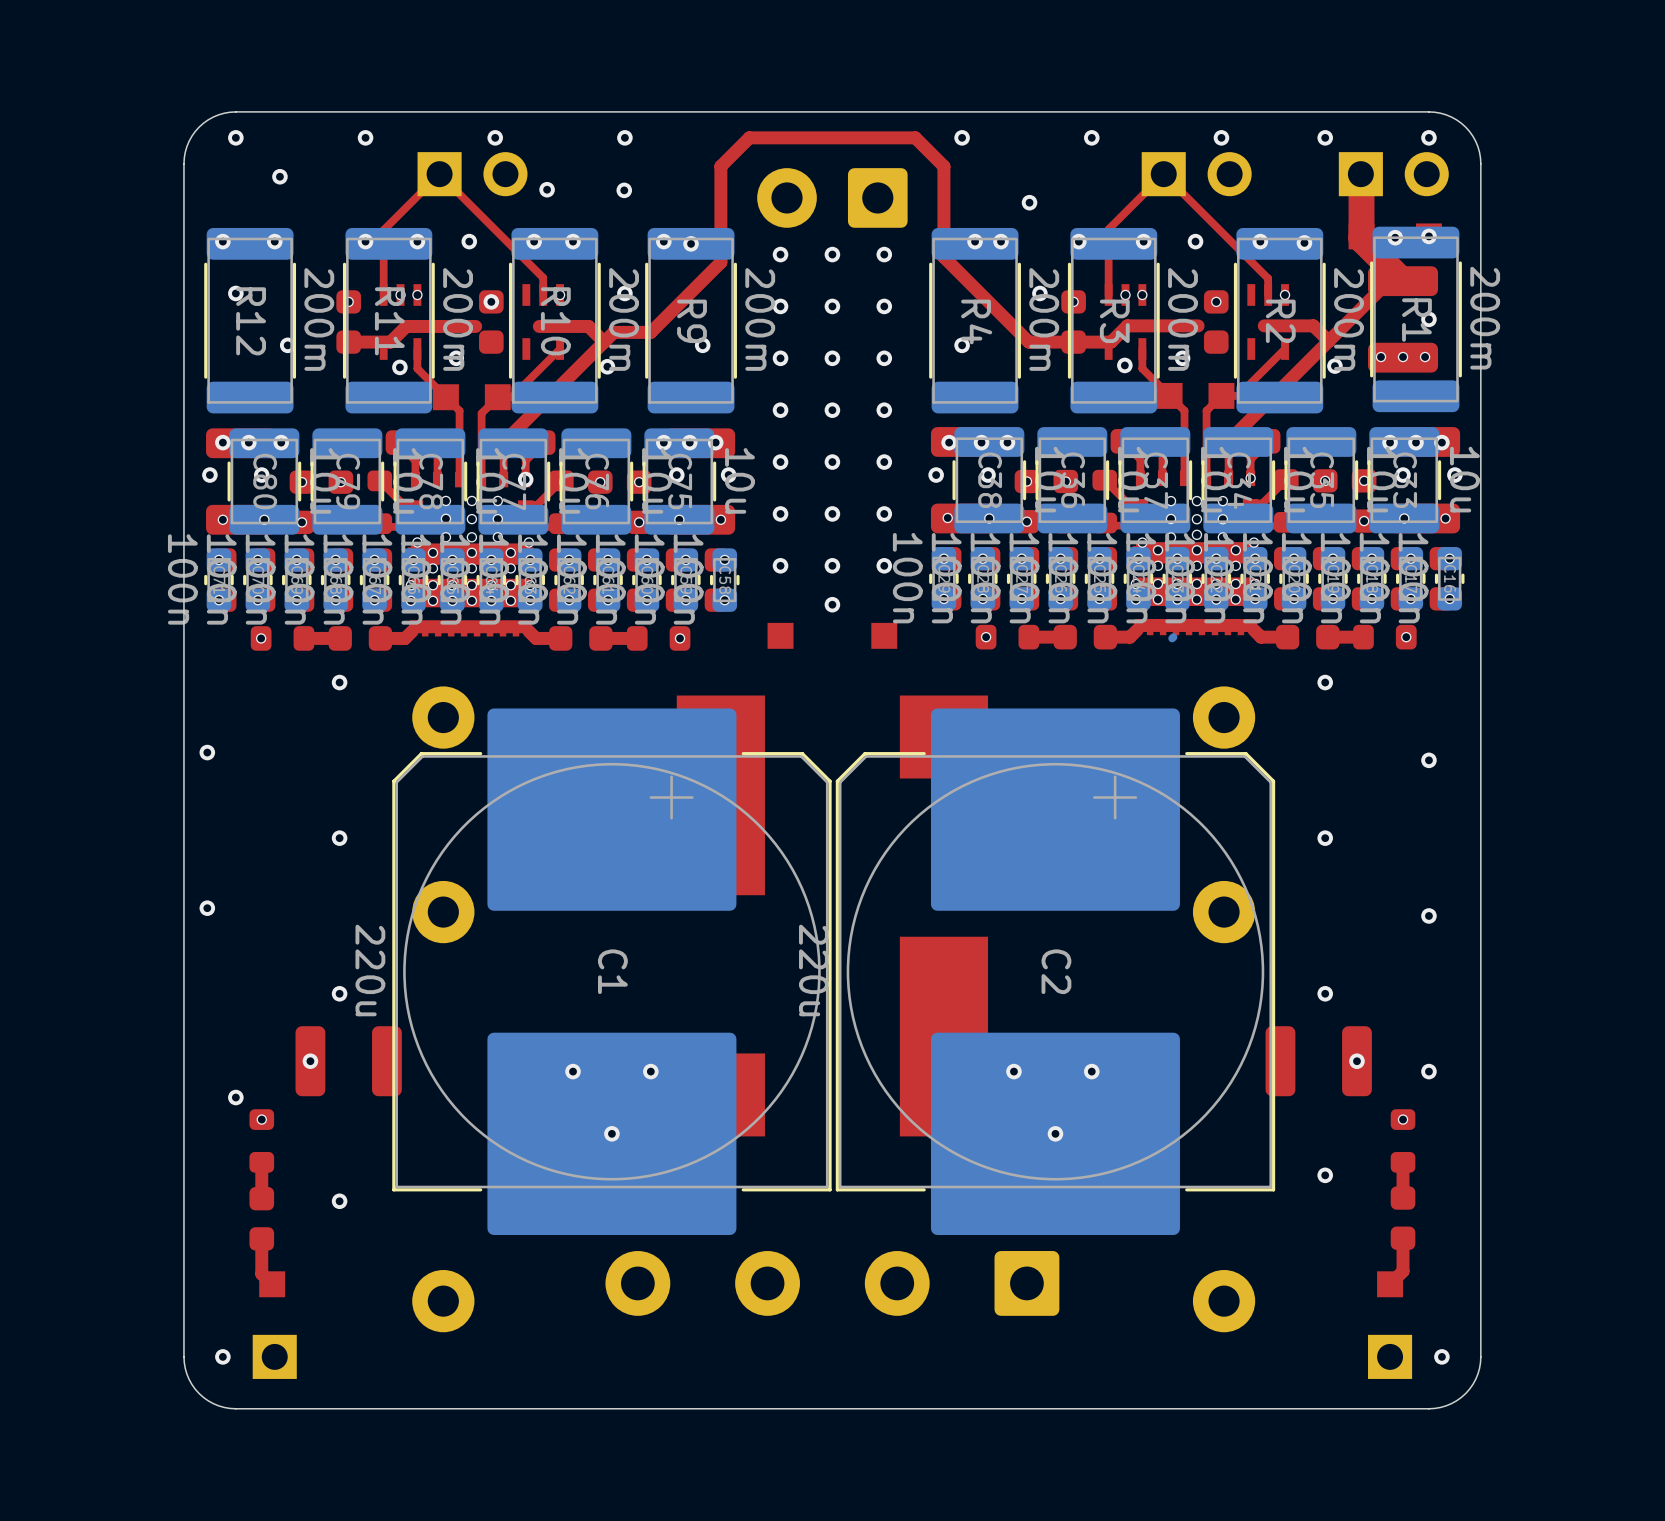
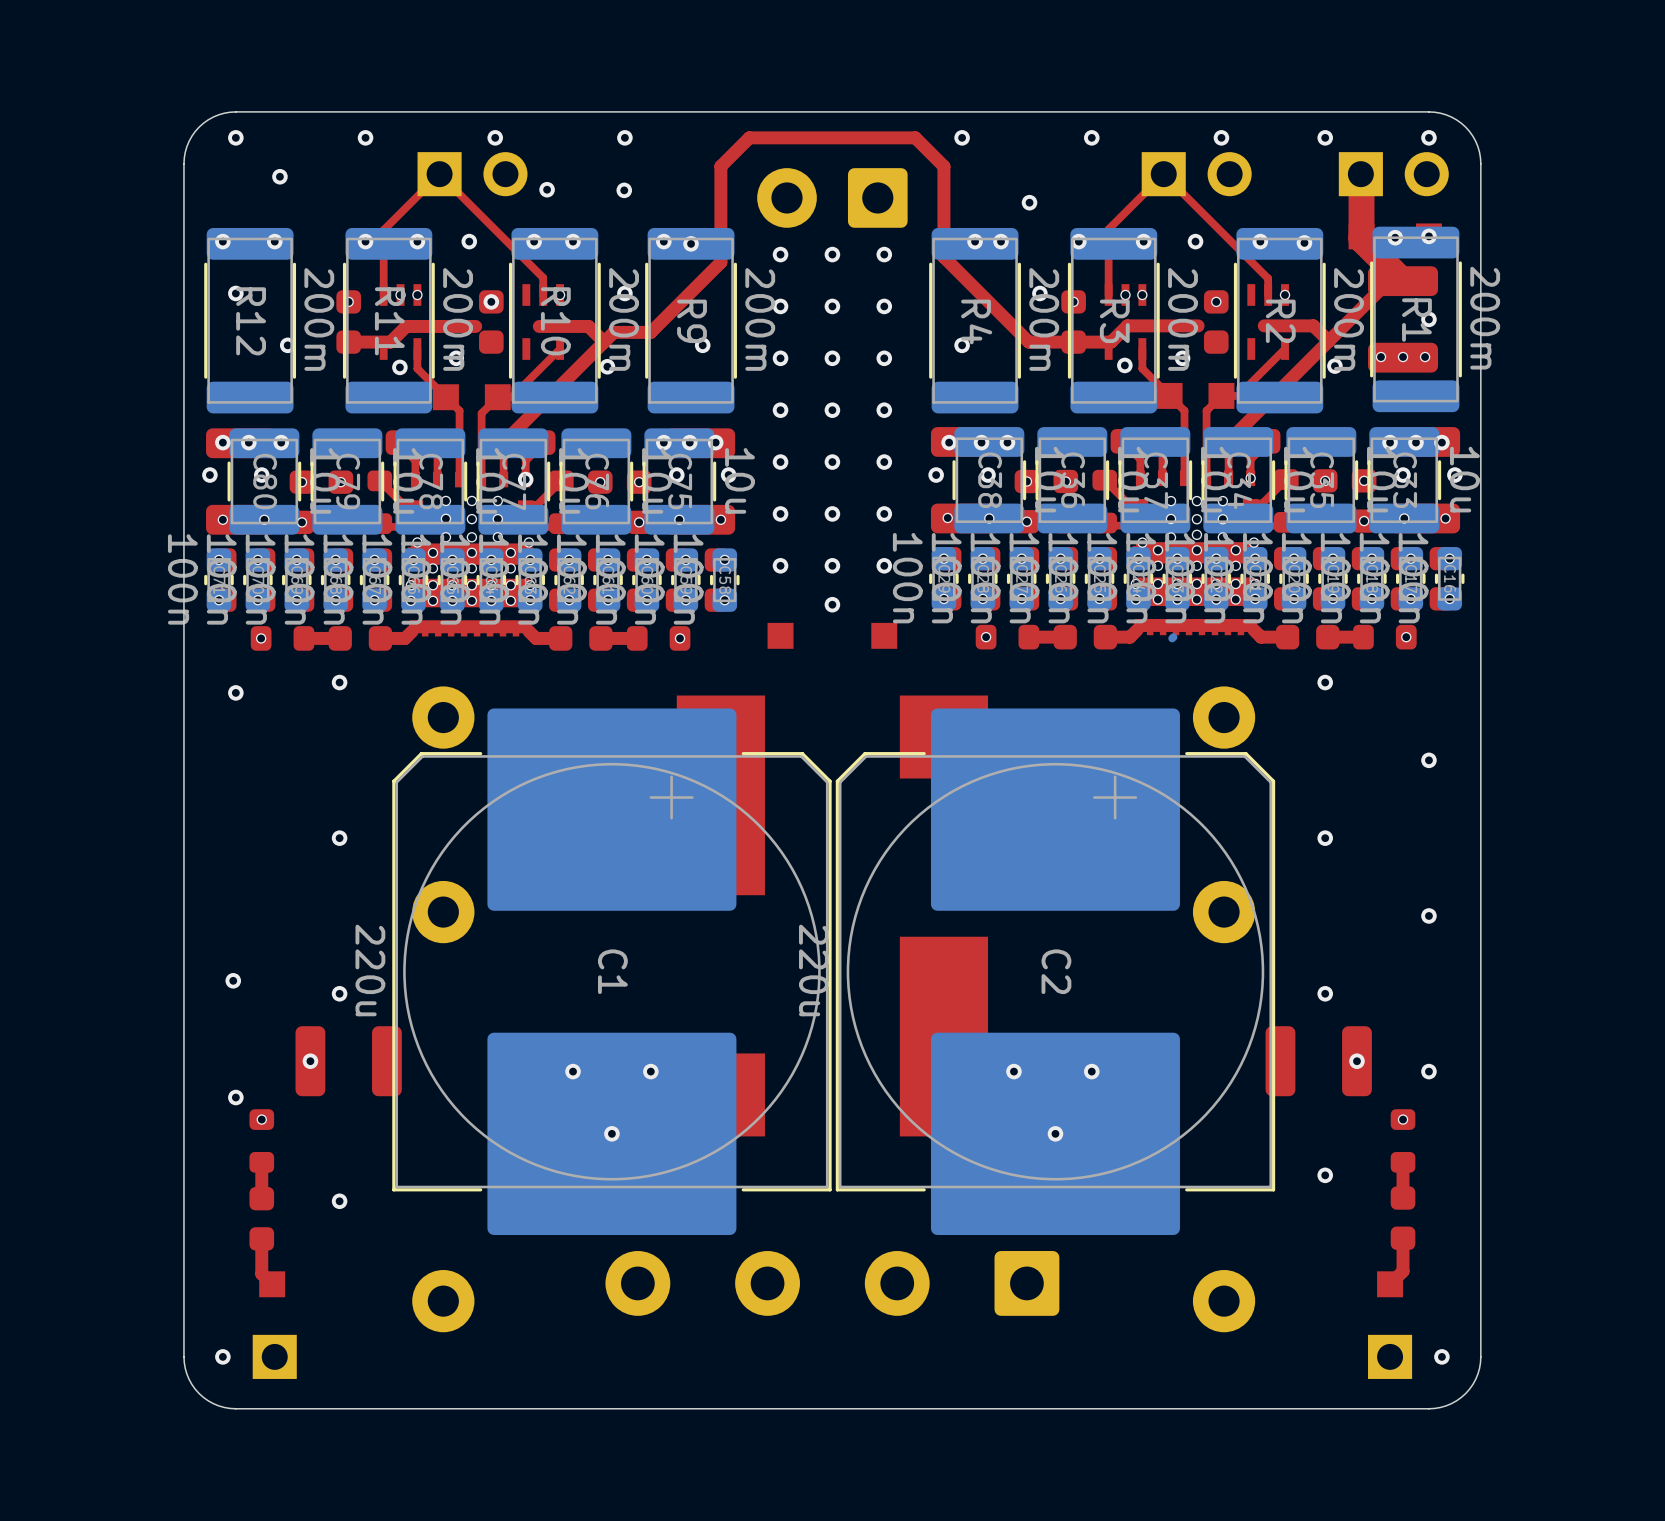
via position: (207, 752) -> (235, 692)
via position: (207, 908) -> (233, 980)

